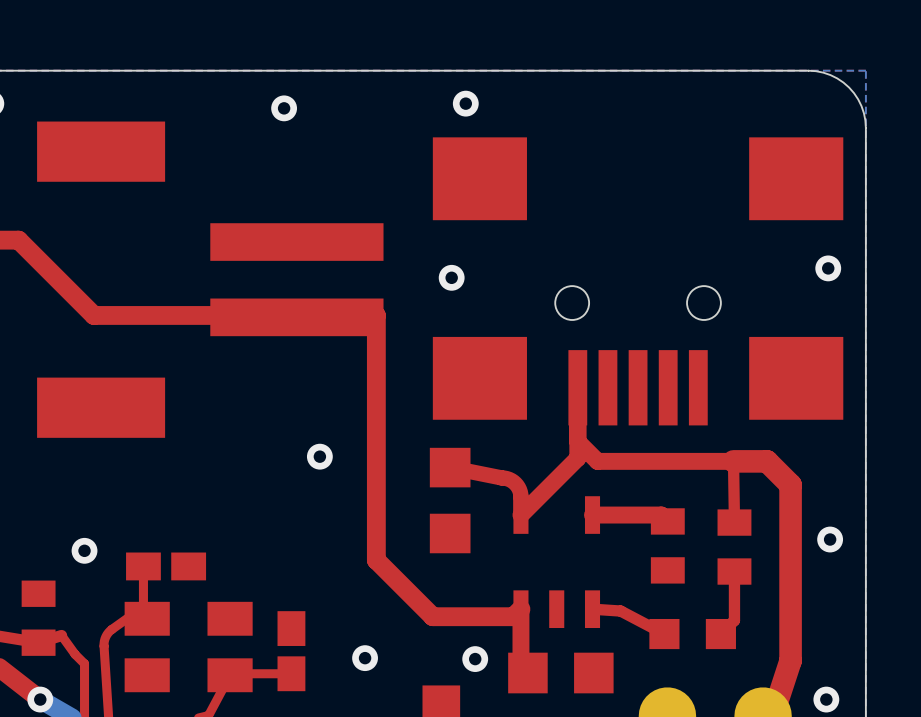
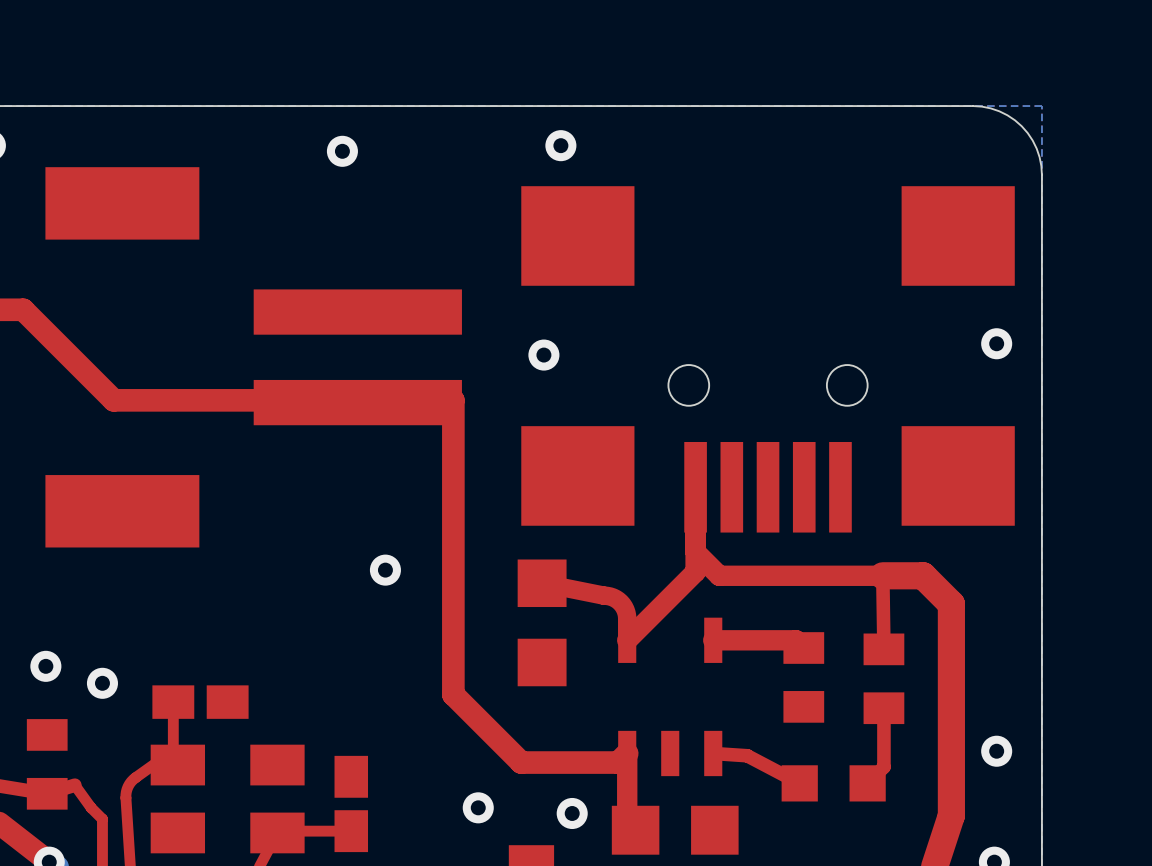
via: none -> (45, 666)
via position: (830, 539) -> (996, 751)
via position: (365, 658) -> (478, 807)

